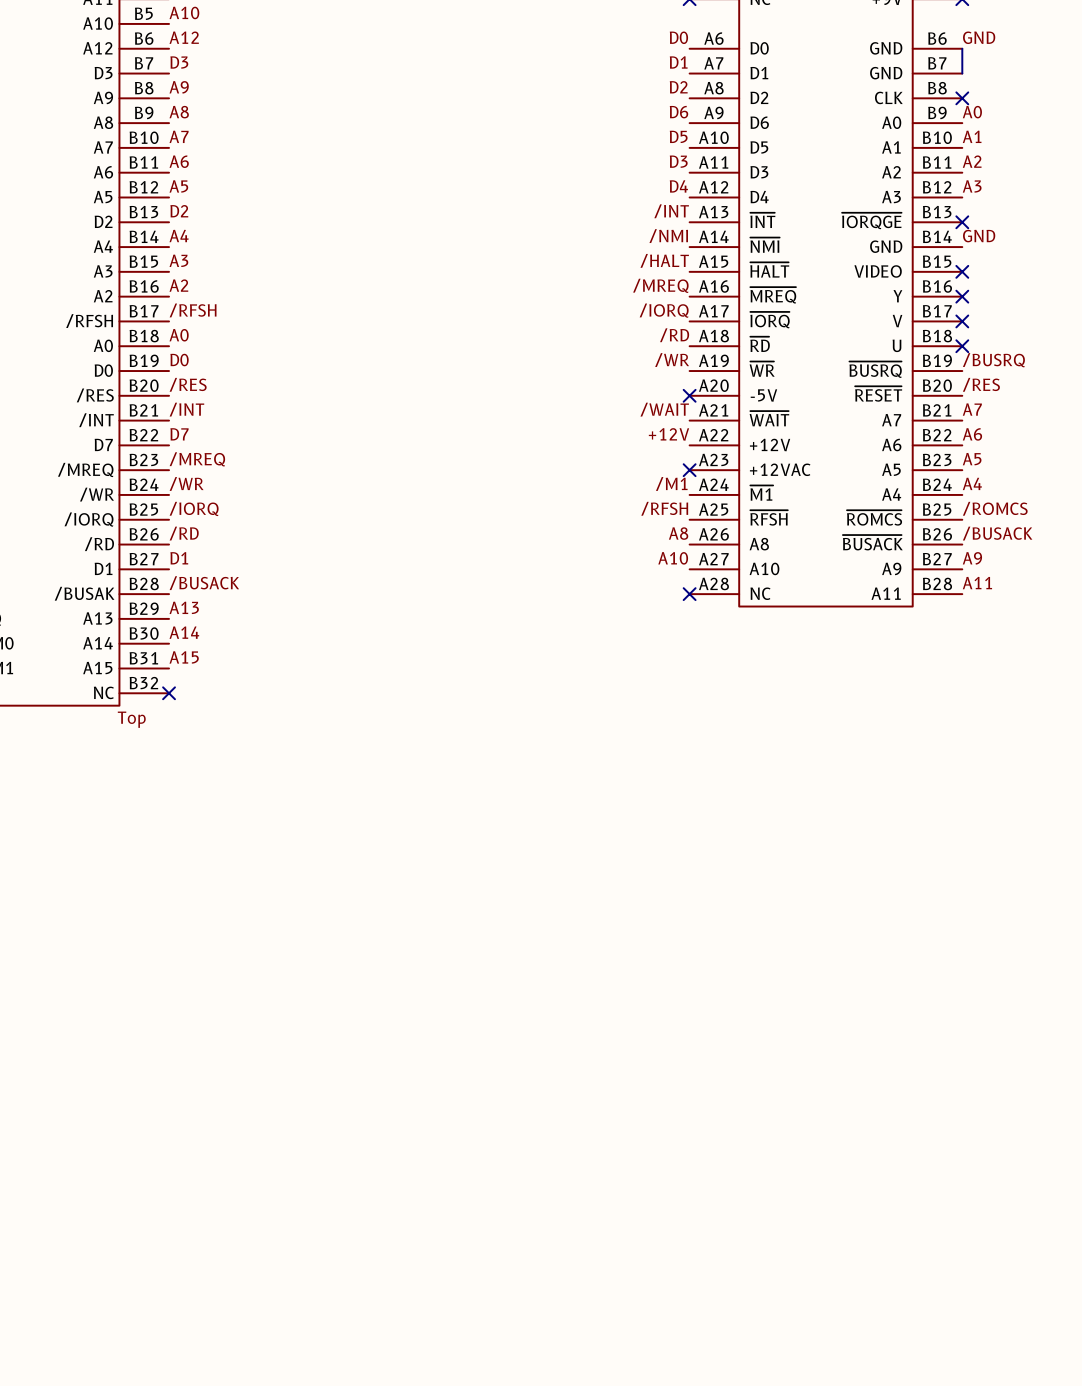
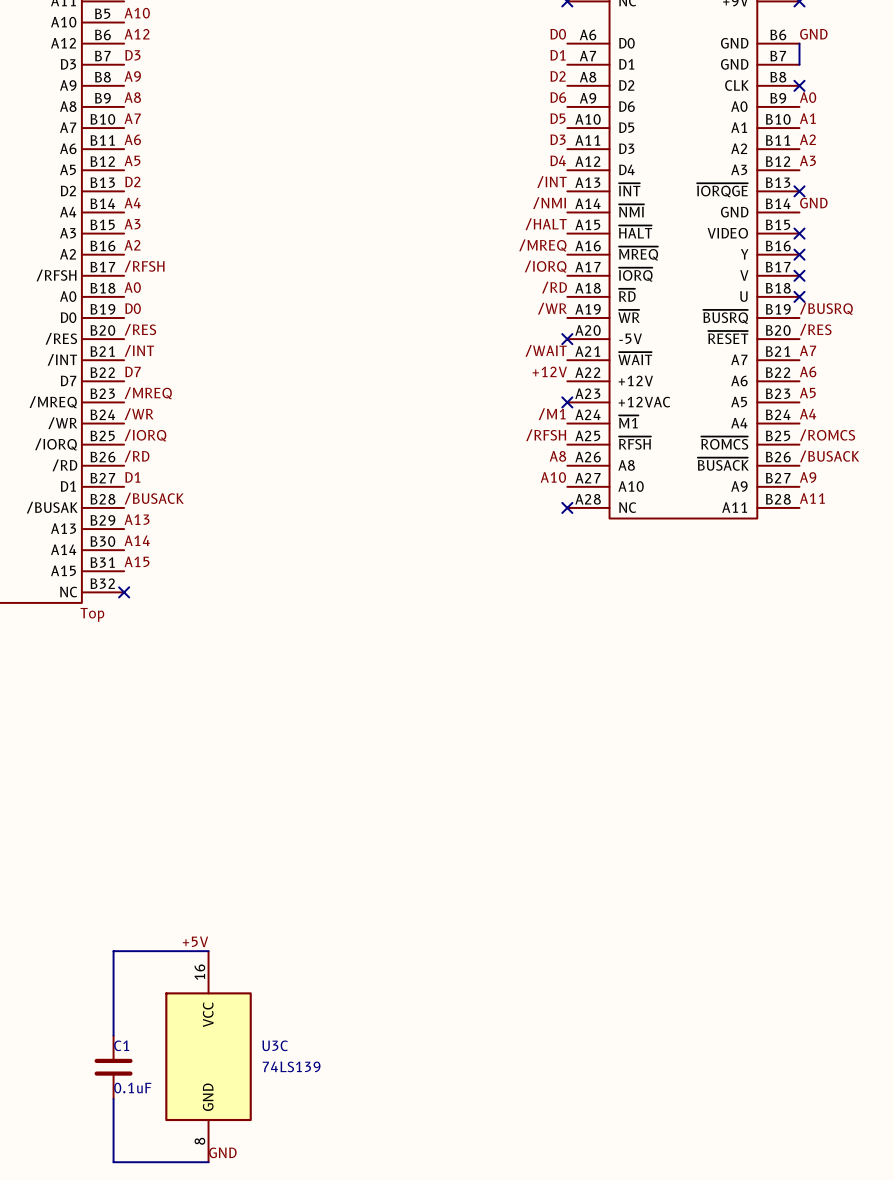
label: none -> +5V (195, 941)
wire: none -> (208, 951) (113, 951) (113, 1035)
U3C: none -> 74LS139 (208, 1056)
C1: none -> 0.1uF (113, 1067)
wire: none -> (113, 1098) (113, 1162) (208, 1162)
label: none -> GND (222, 1152)

